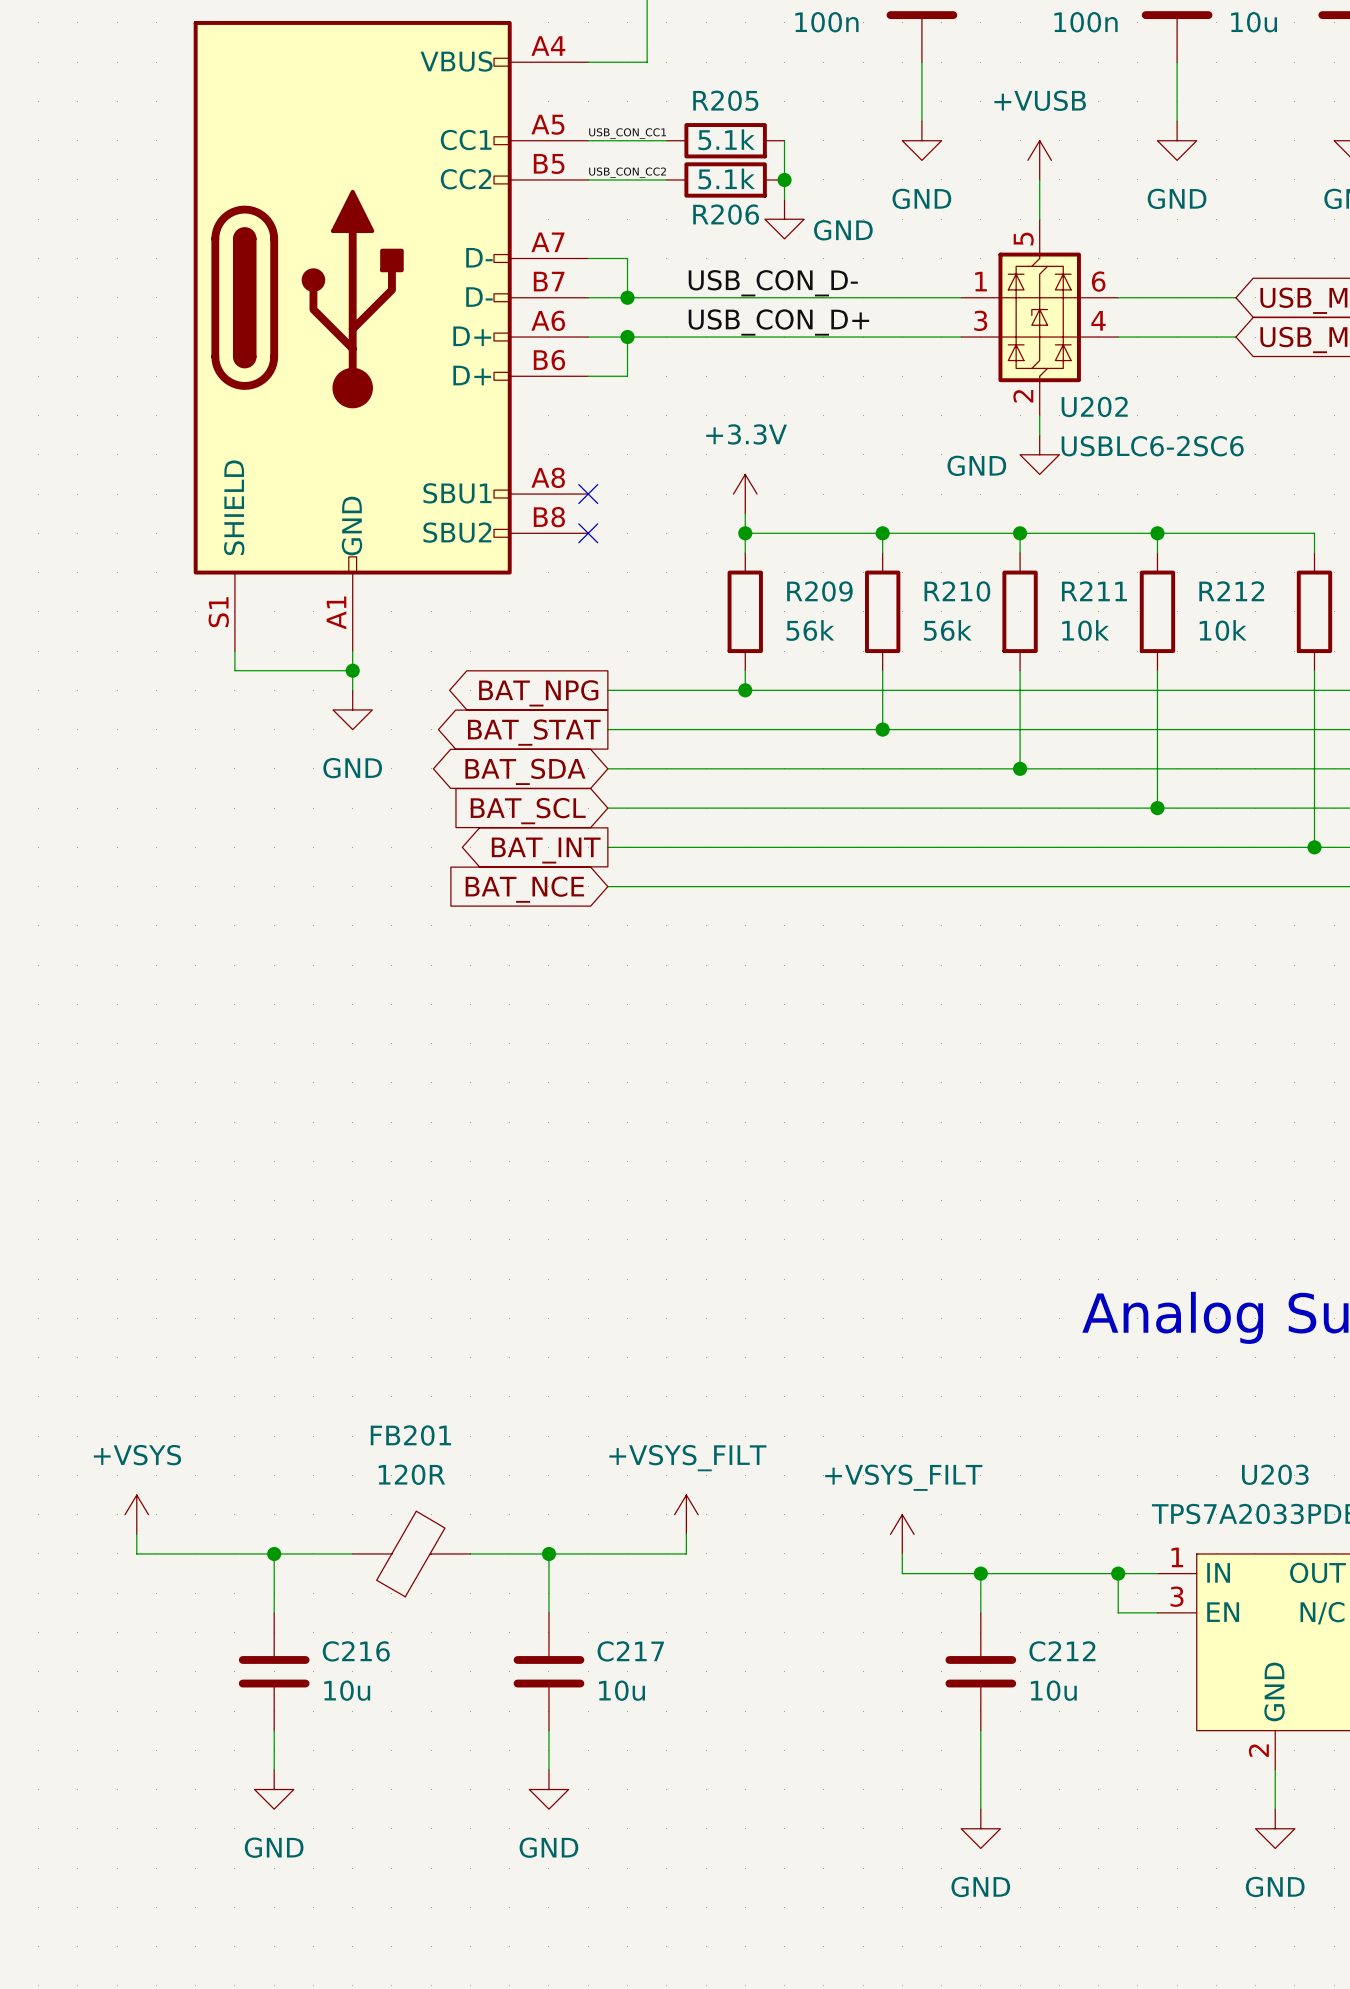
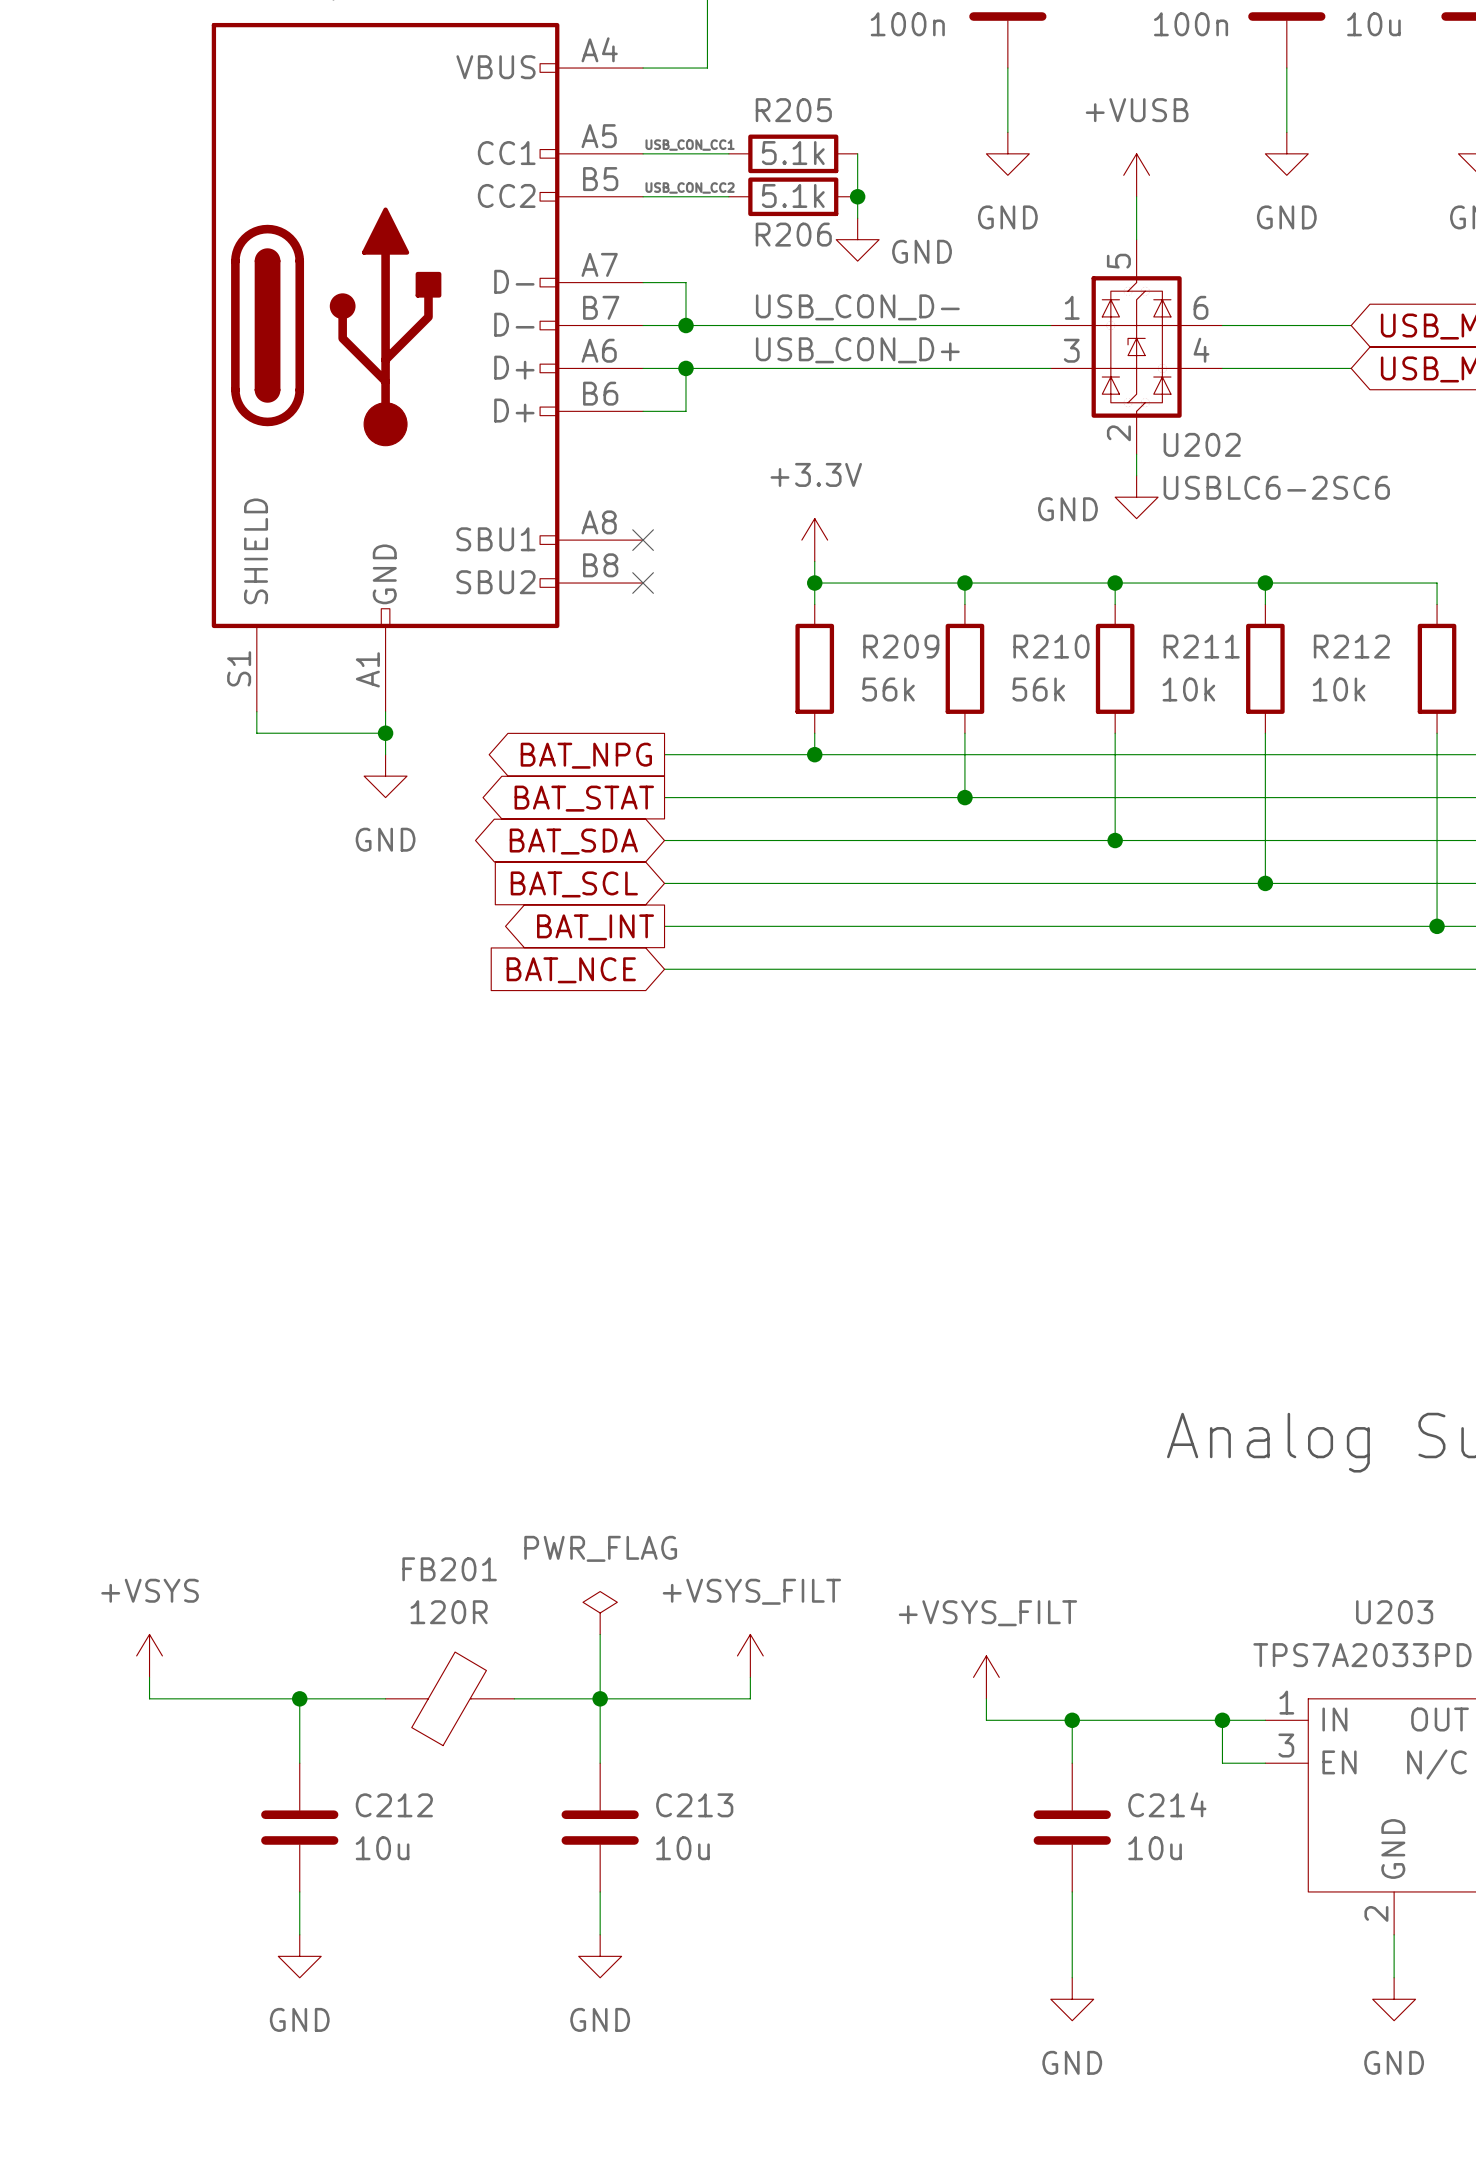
power symbol: none -> PWR_FLAG (600, 1613)
wire: none -> (600, 1634) (600, 1698)
C216 name: C216 (356, 1651) -> C212 (394, 1805)
C217 name: C217 (630, 1651) -> C213 (694, 1805)
C212 name: C212 (1062, 1651) -> C214 (1167, 1804)

